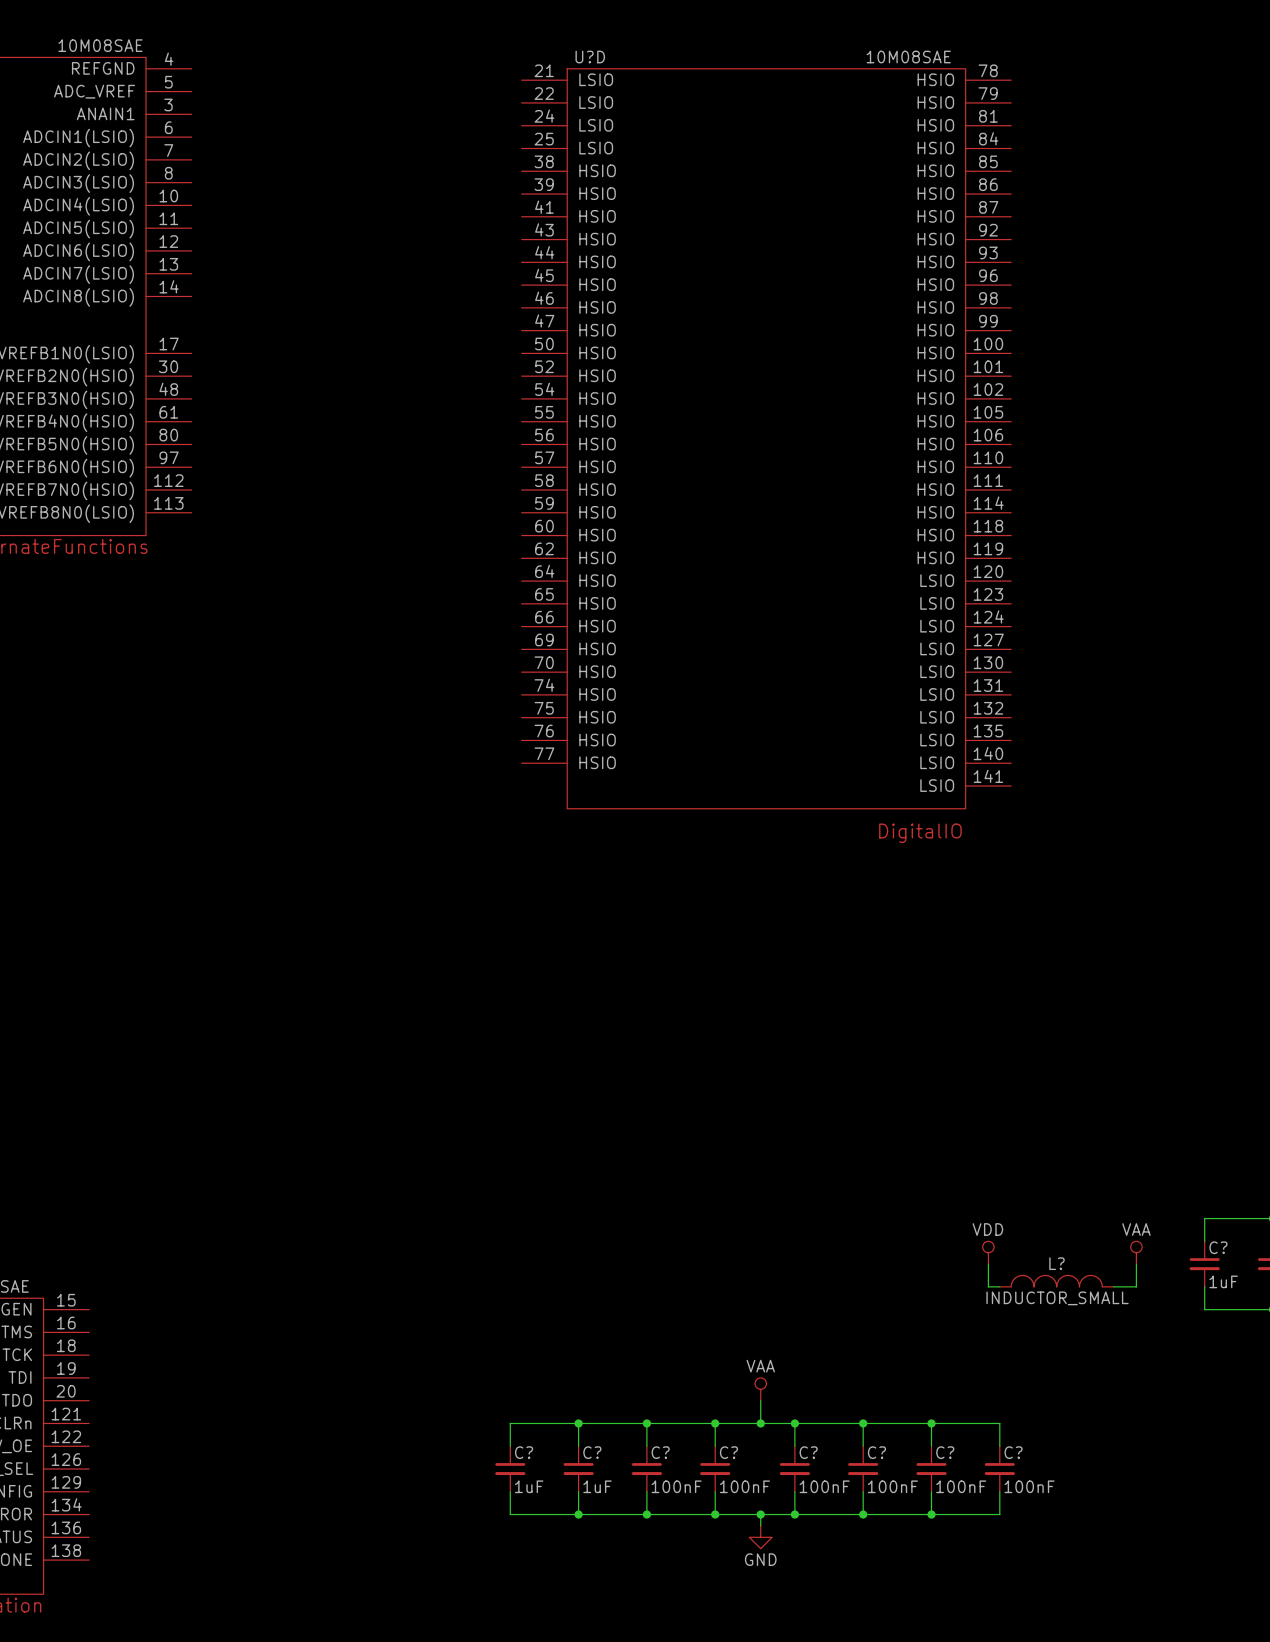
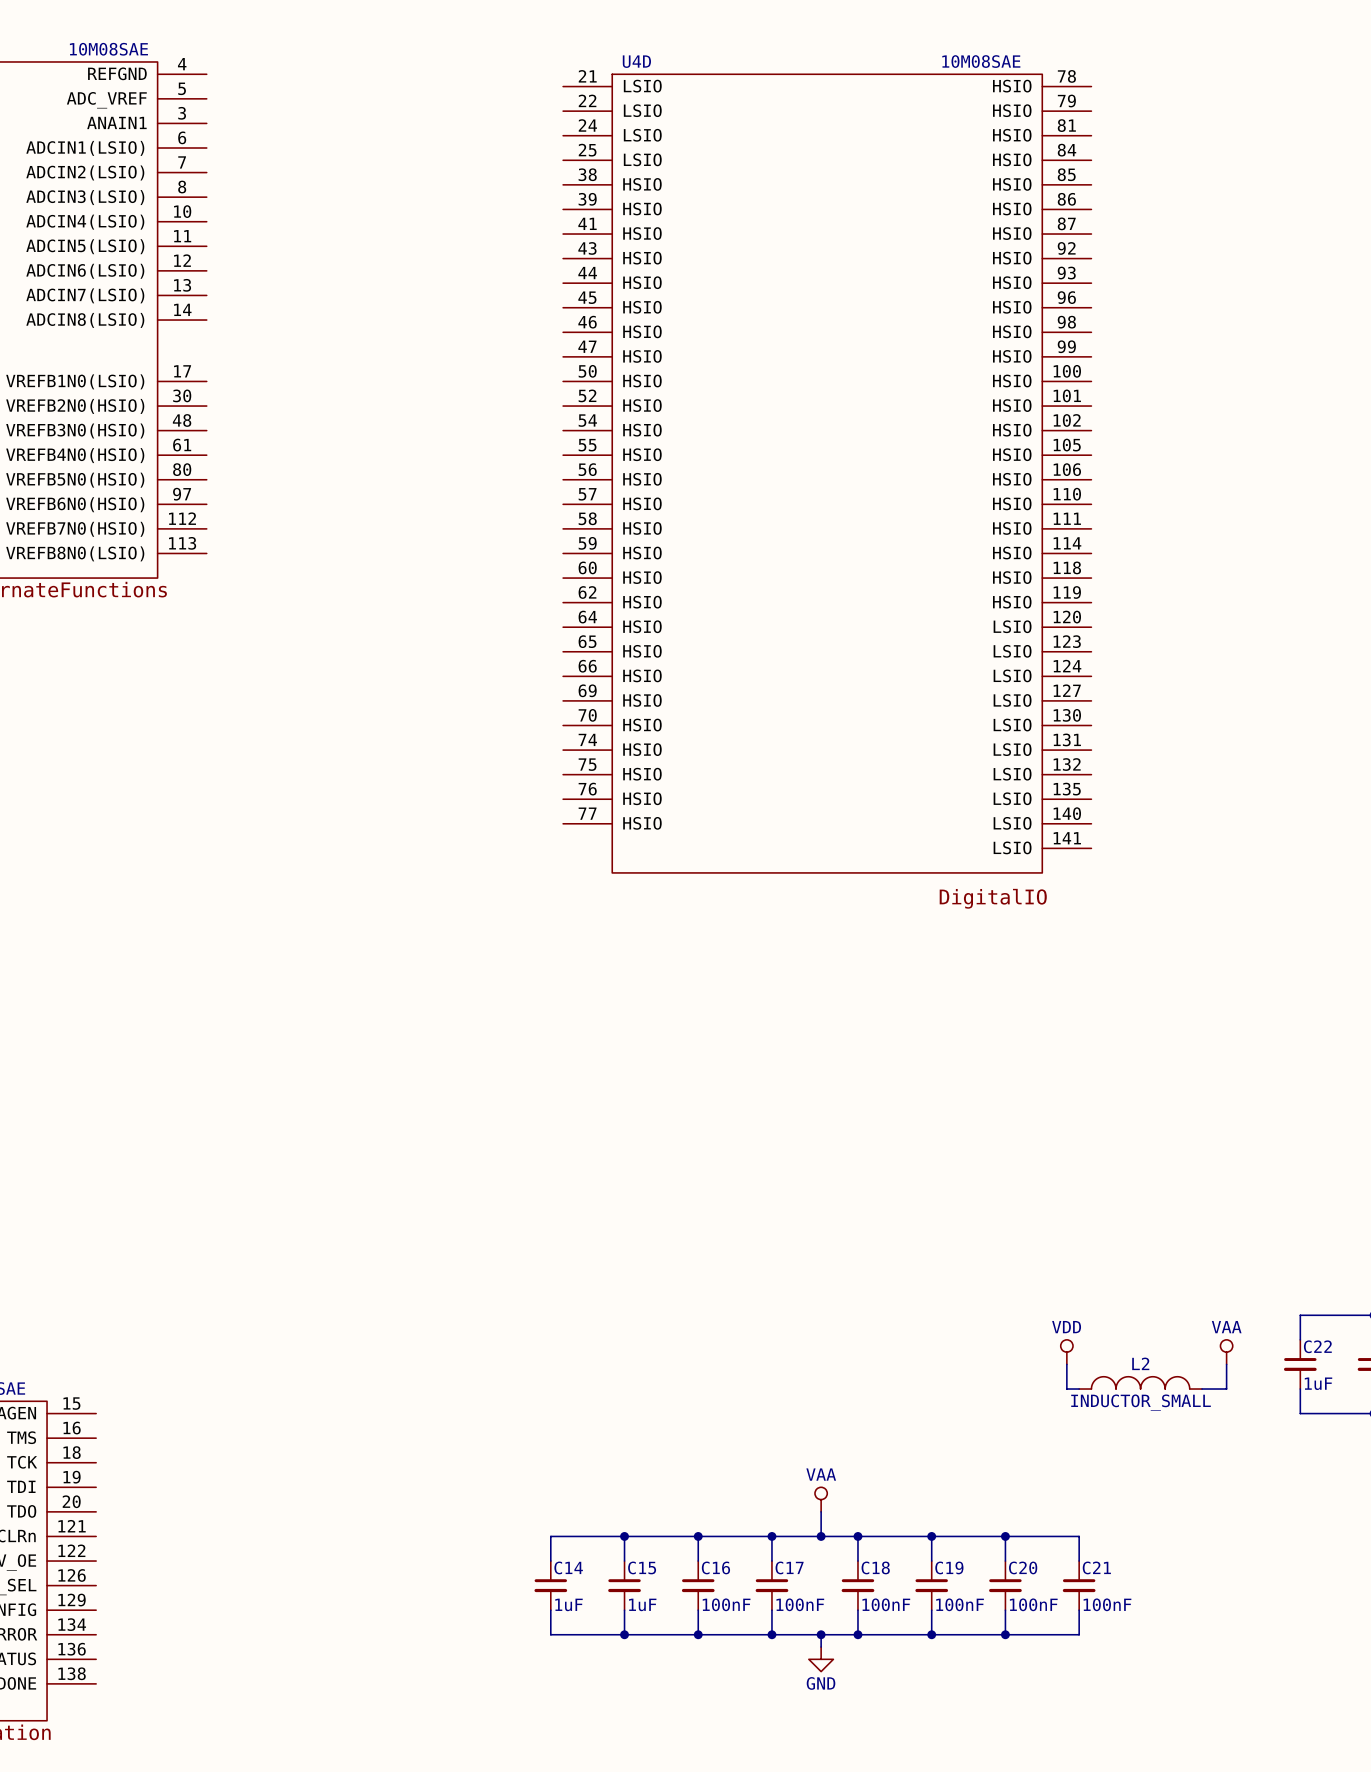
U?D name: U?D (590, 57) -> U4D (636, 61)
C? name: C? (1218, 1247) -> C22 (1317, 1346)
L? name: L? (1056, 1263) -> L2 (1140, 1363)
C? name: C? (524, 1452) -> C14 (568, 1567)
C? name: C? (592, 1452) -> C15 (642, 1567)
C? name: C? (660, 1452) -> C16 (715, 1567)
C? name: C? (728, 1452) -> C17 (789, 1567)
C? name: C? (808, 1452) -> C18 (875, 1567)
C? name: C? (876, 1452) -> C19 (949, 1567)
C? name: C? (945, 1452) -> C20 (1023, 1567)
C? name: C? (1013, 1452) -> C21 (1096, 1567)

